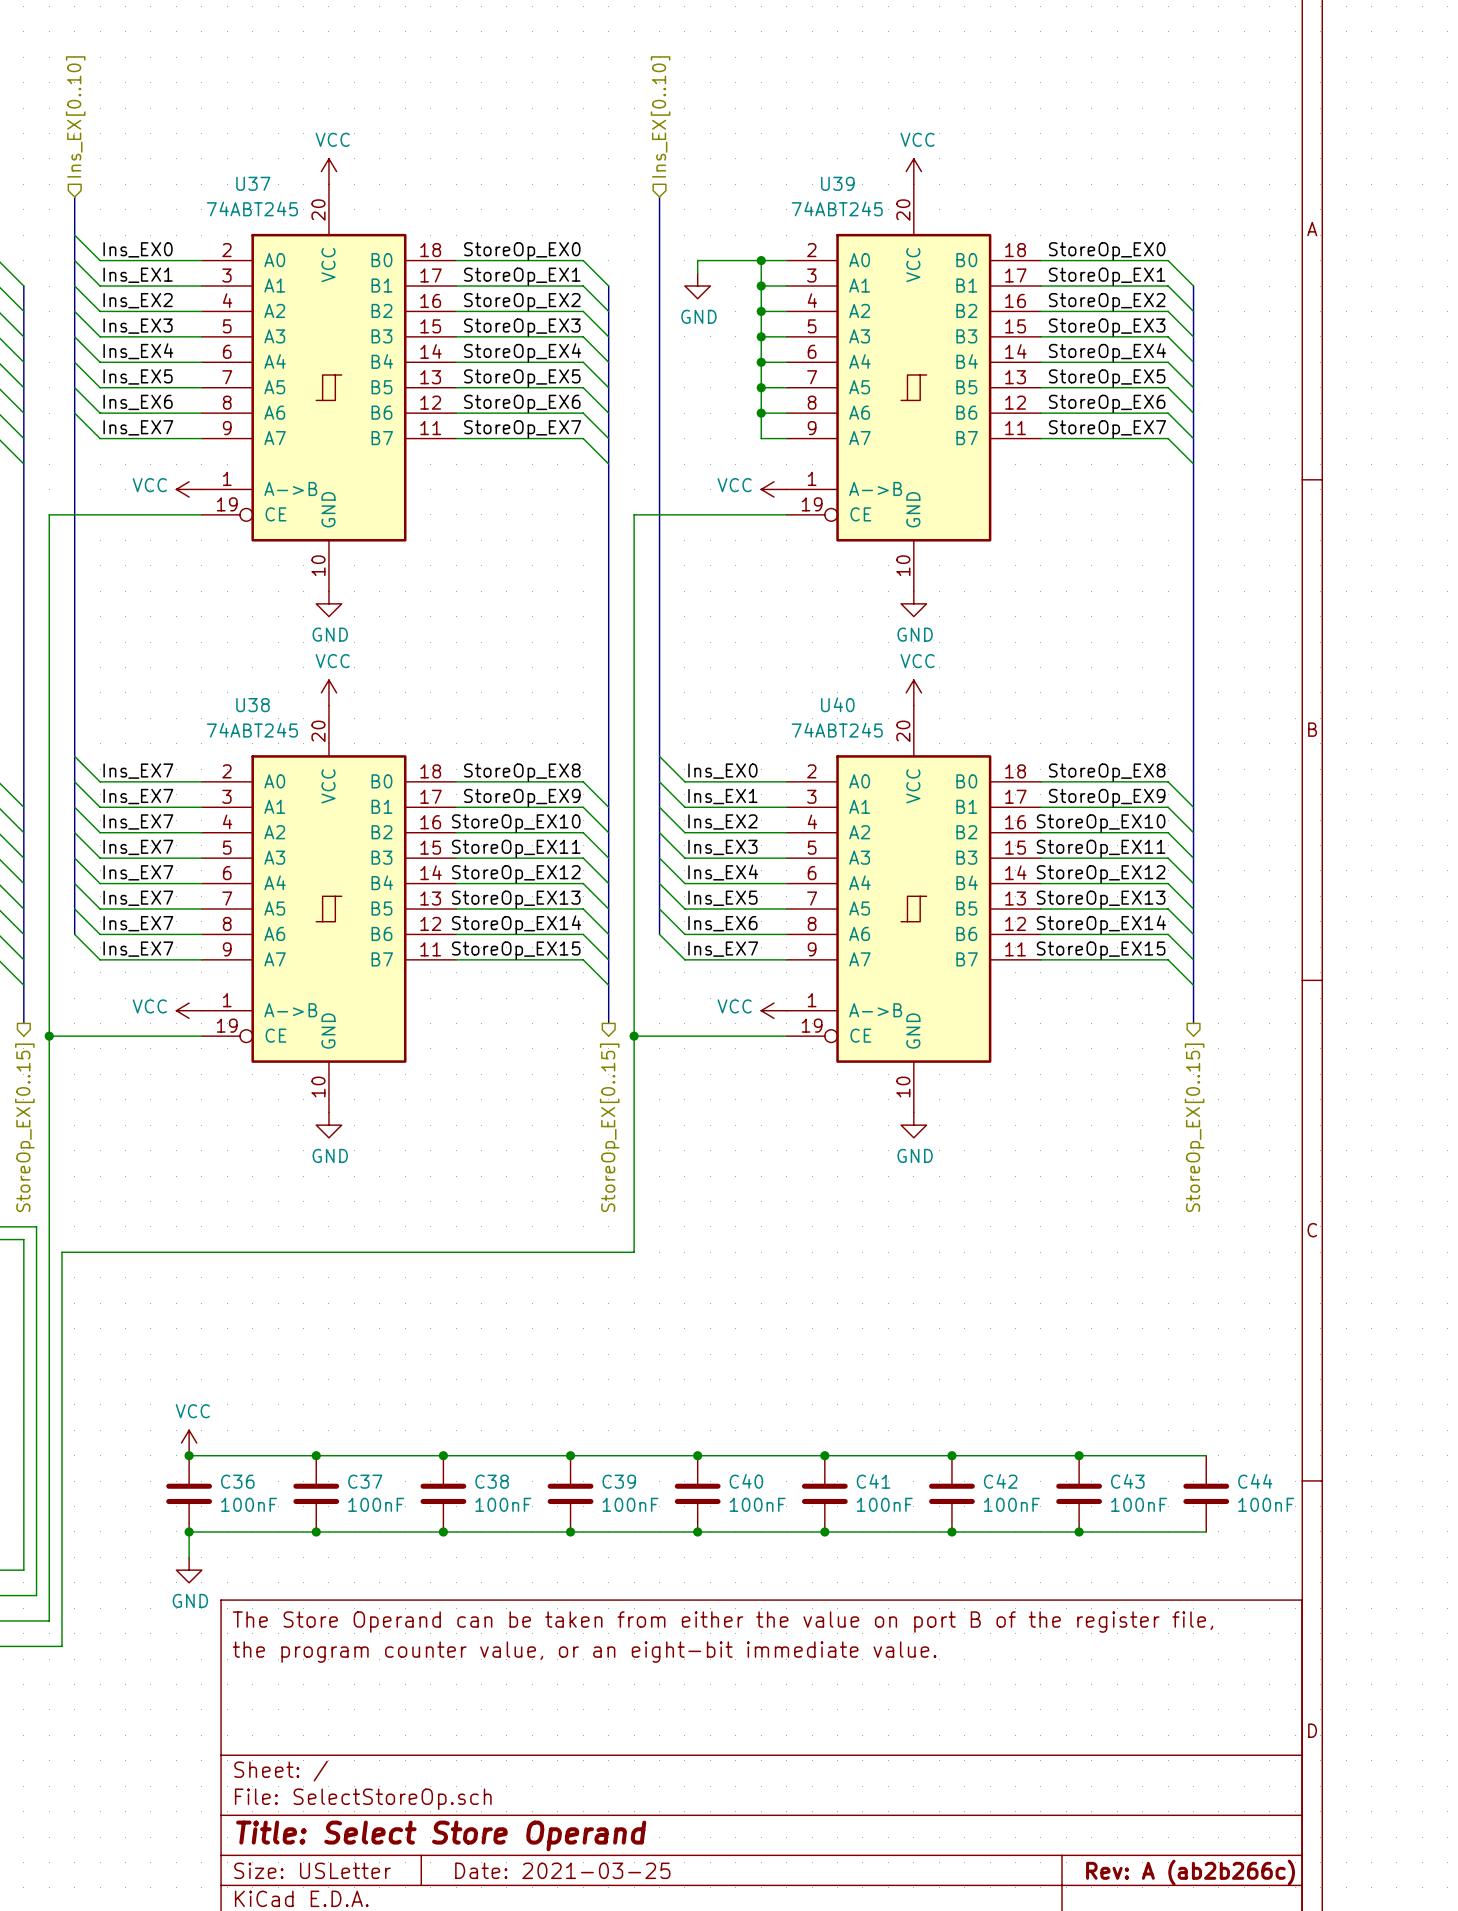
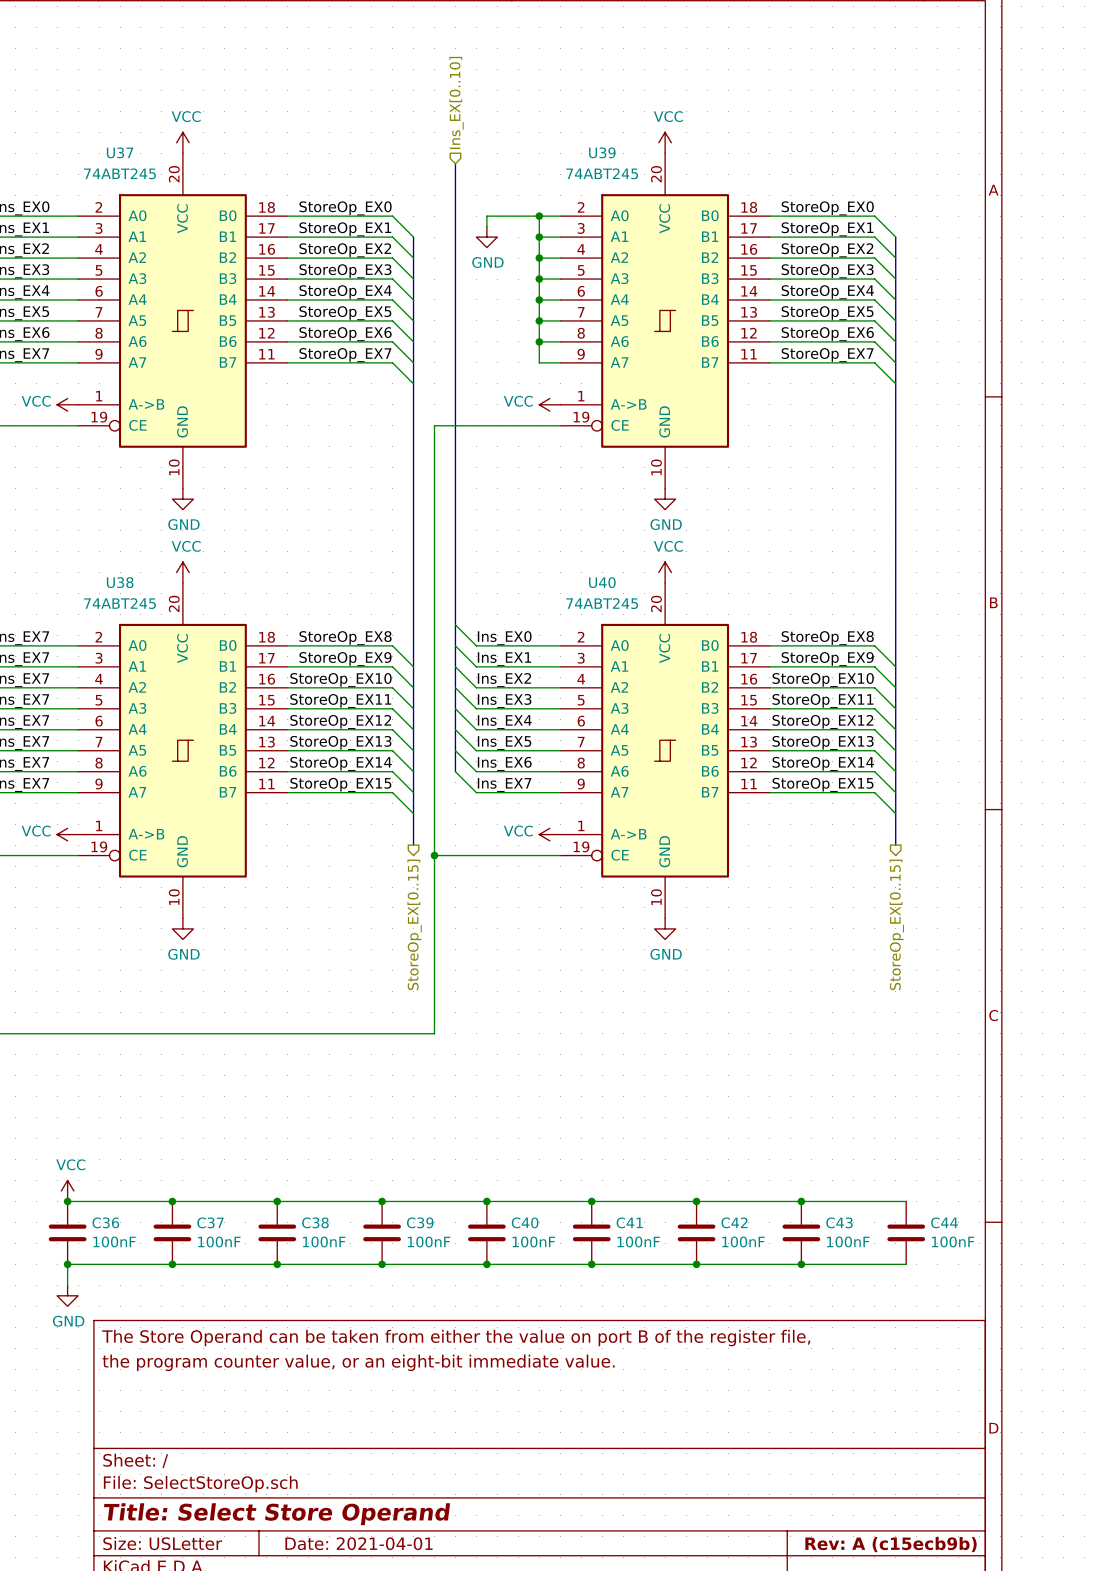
title block: Date: 2021-03-25 (562, 1870) -> Date: 2021-04-01 (359, 1543)
title block: Rev: A (ab2b266c) (1190, 1872) -> Rev: A (c15ecb9b) (890, 1544)

